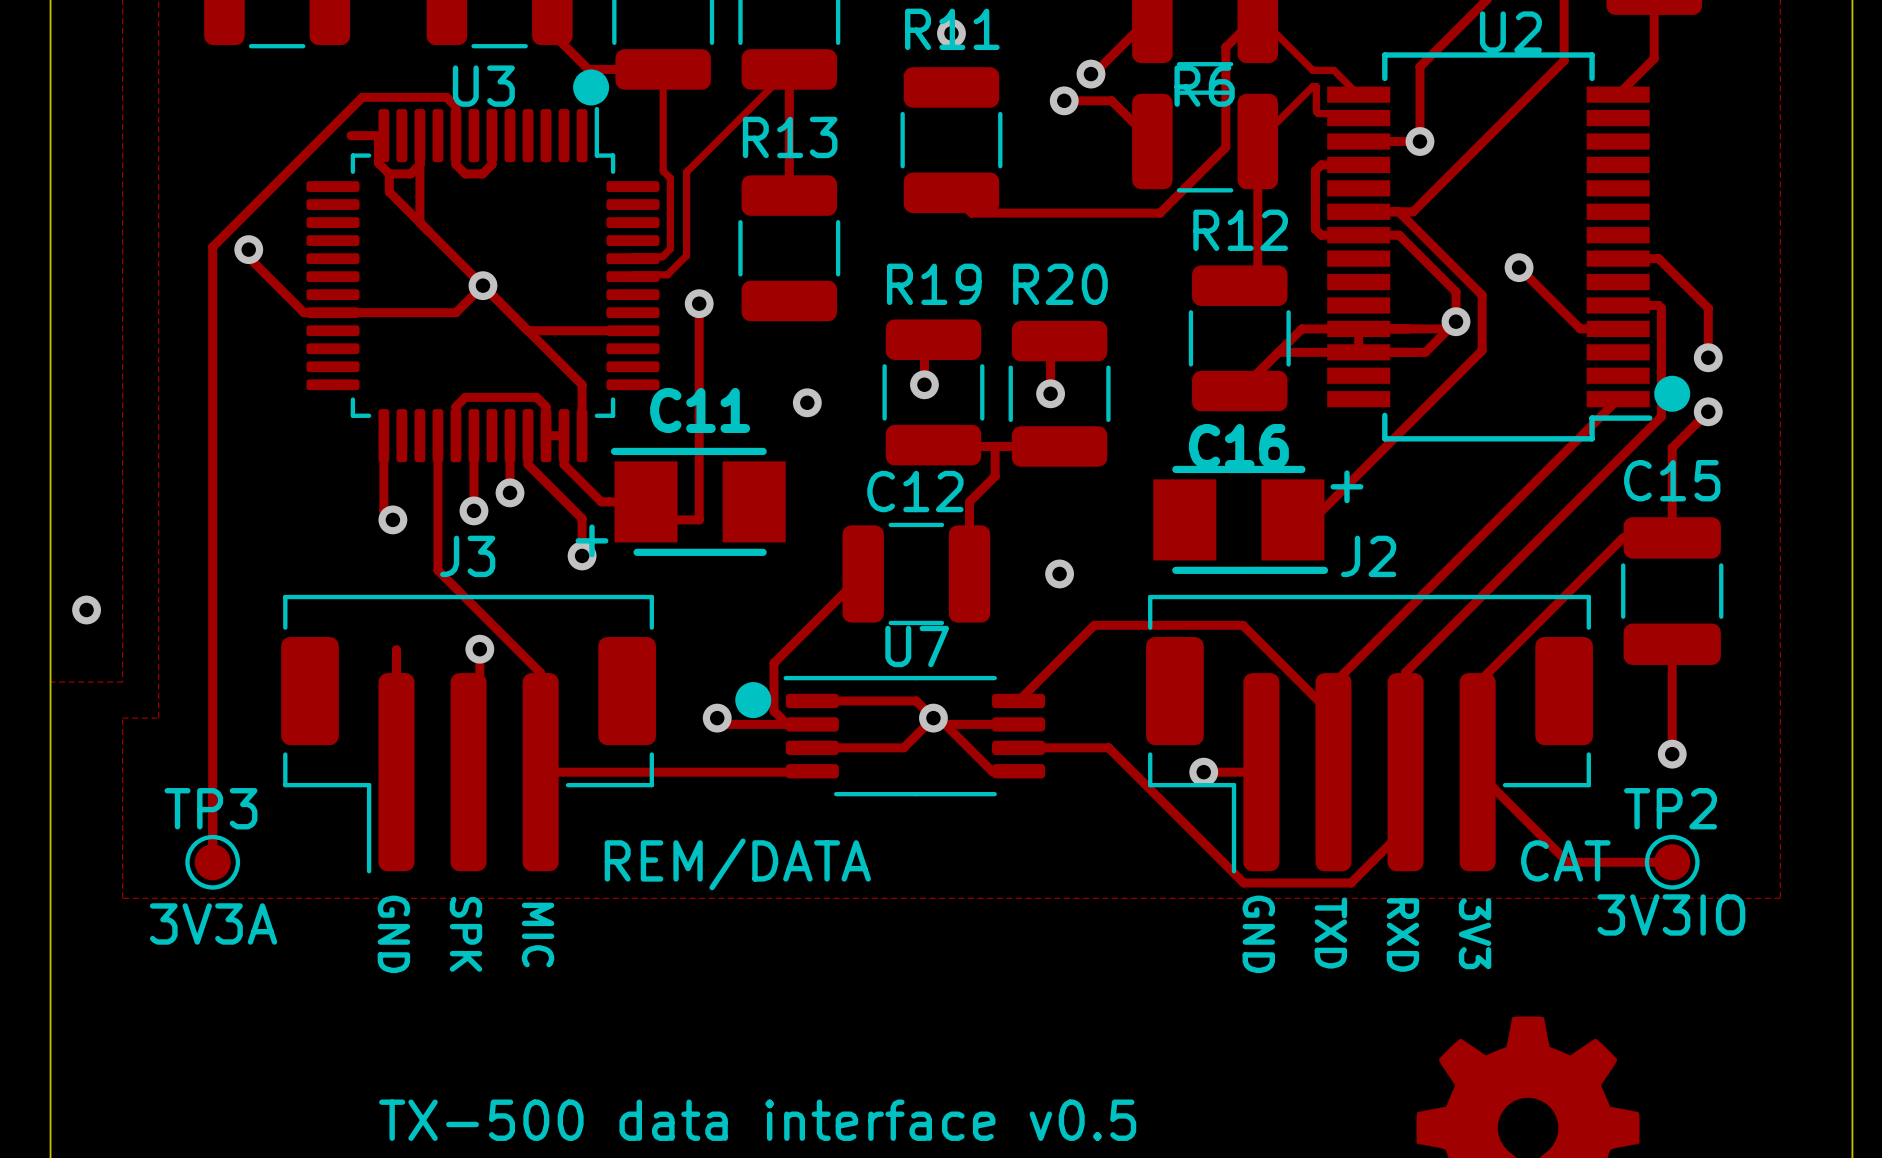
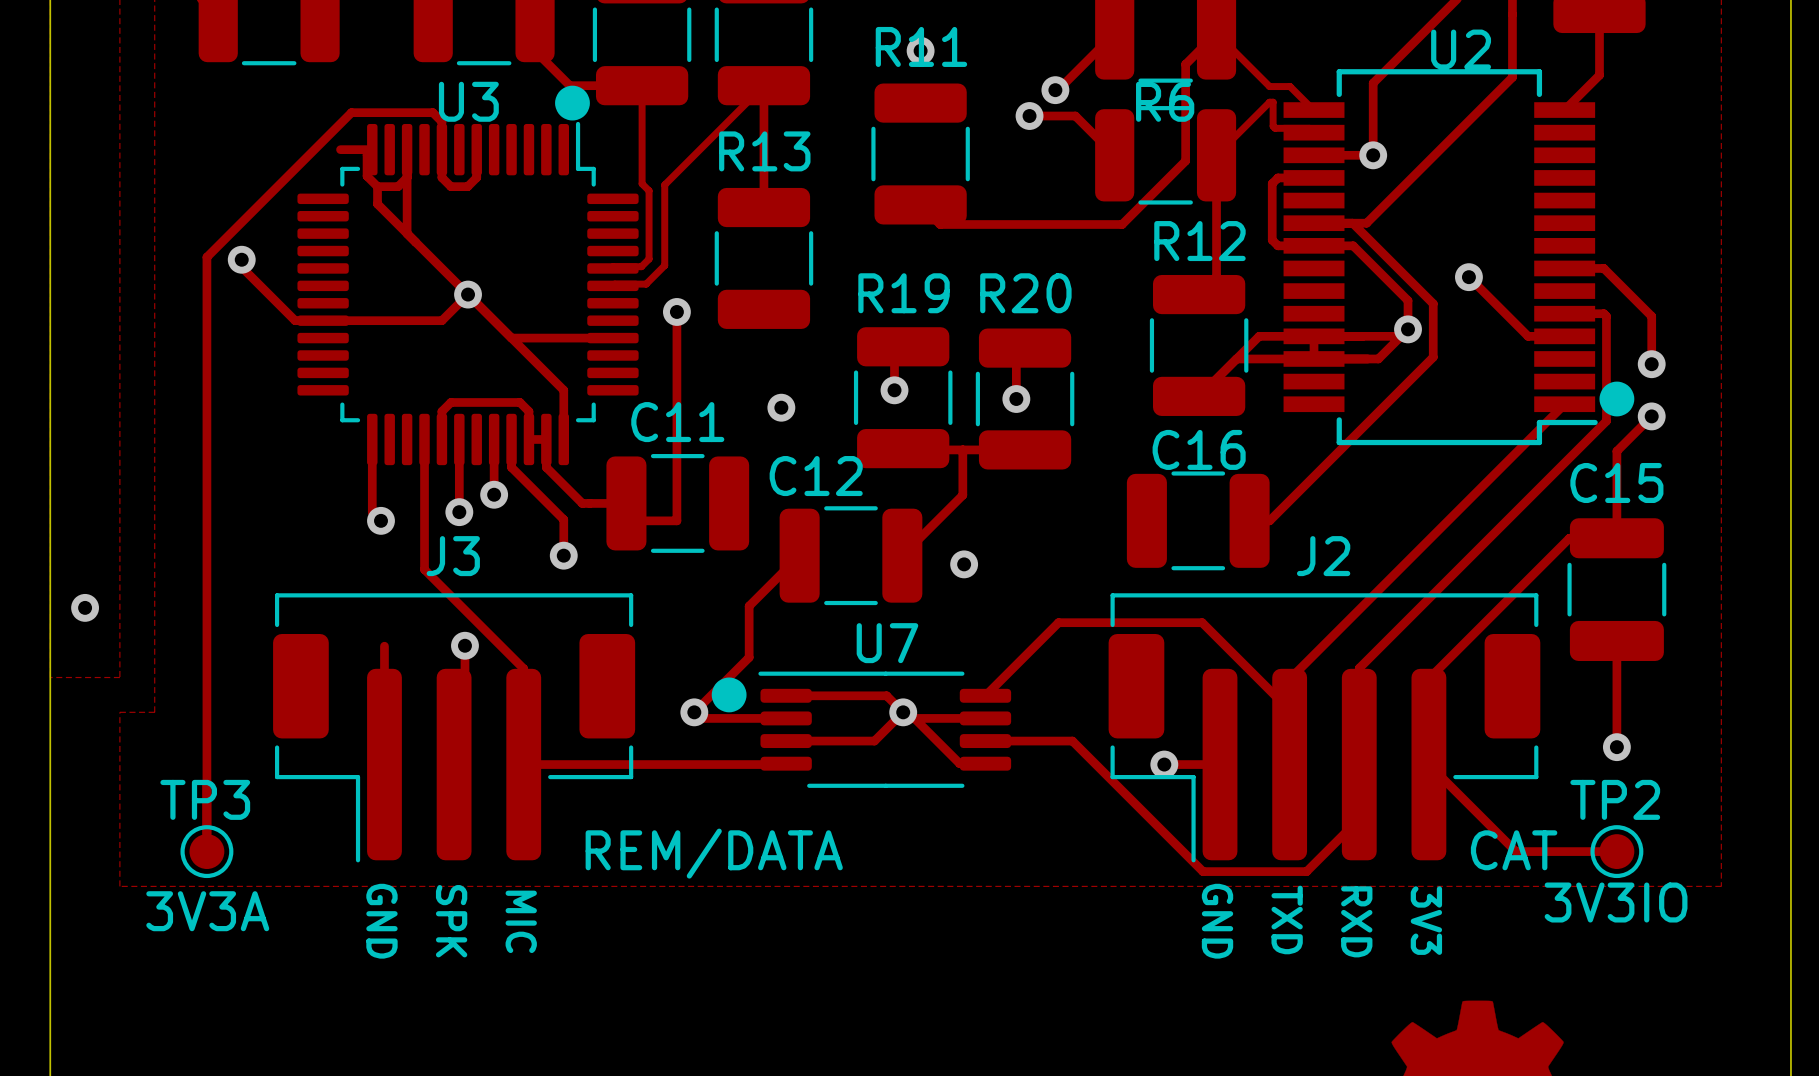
C11 footprint: [610, 447, 786, 556] -> [606, 454, 750, 553]
C16 footprint: [1153, 465, 1329, 574] -> [1126, 471, 1270, 571]
track: (995, 476) (969, 501) (969, 573) -> (962, 478) (962, 495) (902, 555)
C12 name position: C12 (915, 491) -> C12 (816, 476)
track: none -> (799, 555) (749, 606) (749, 657) (694, 712)
track: (863, 573) (773, 663) (773, 710) (787, 724) -> none
C12 position: (916, 573) -> (850, 555)
via position: (1059, 573) -> (964, 564)

